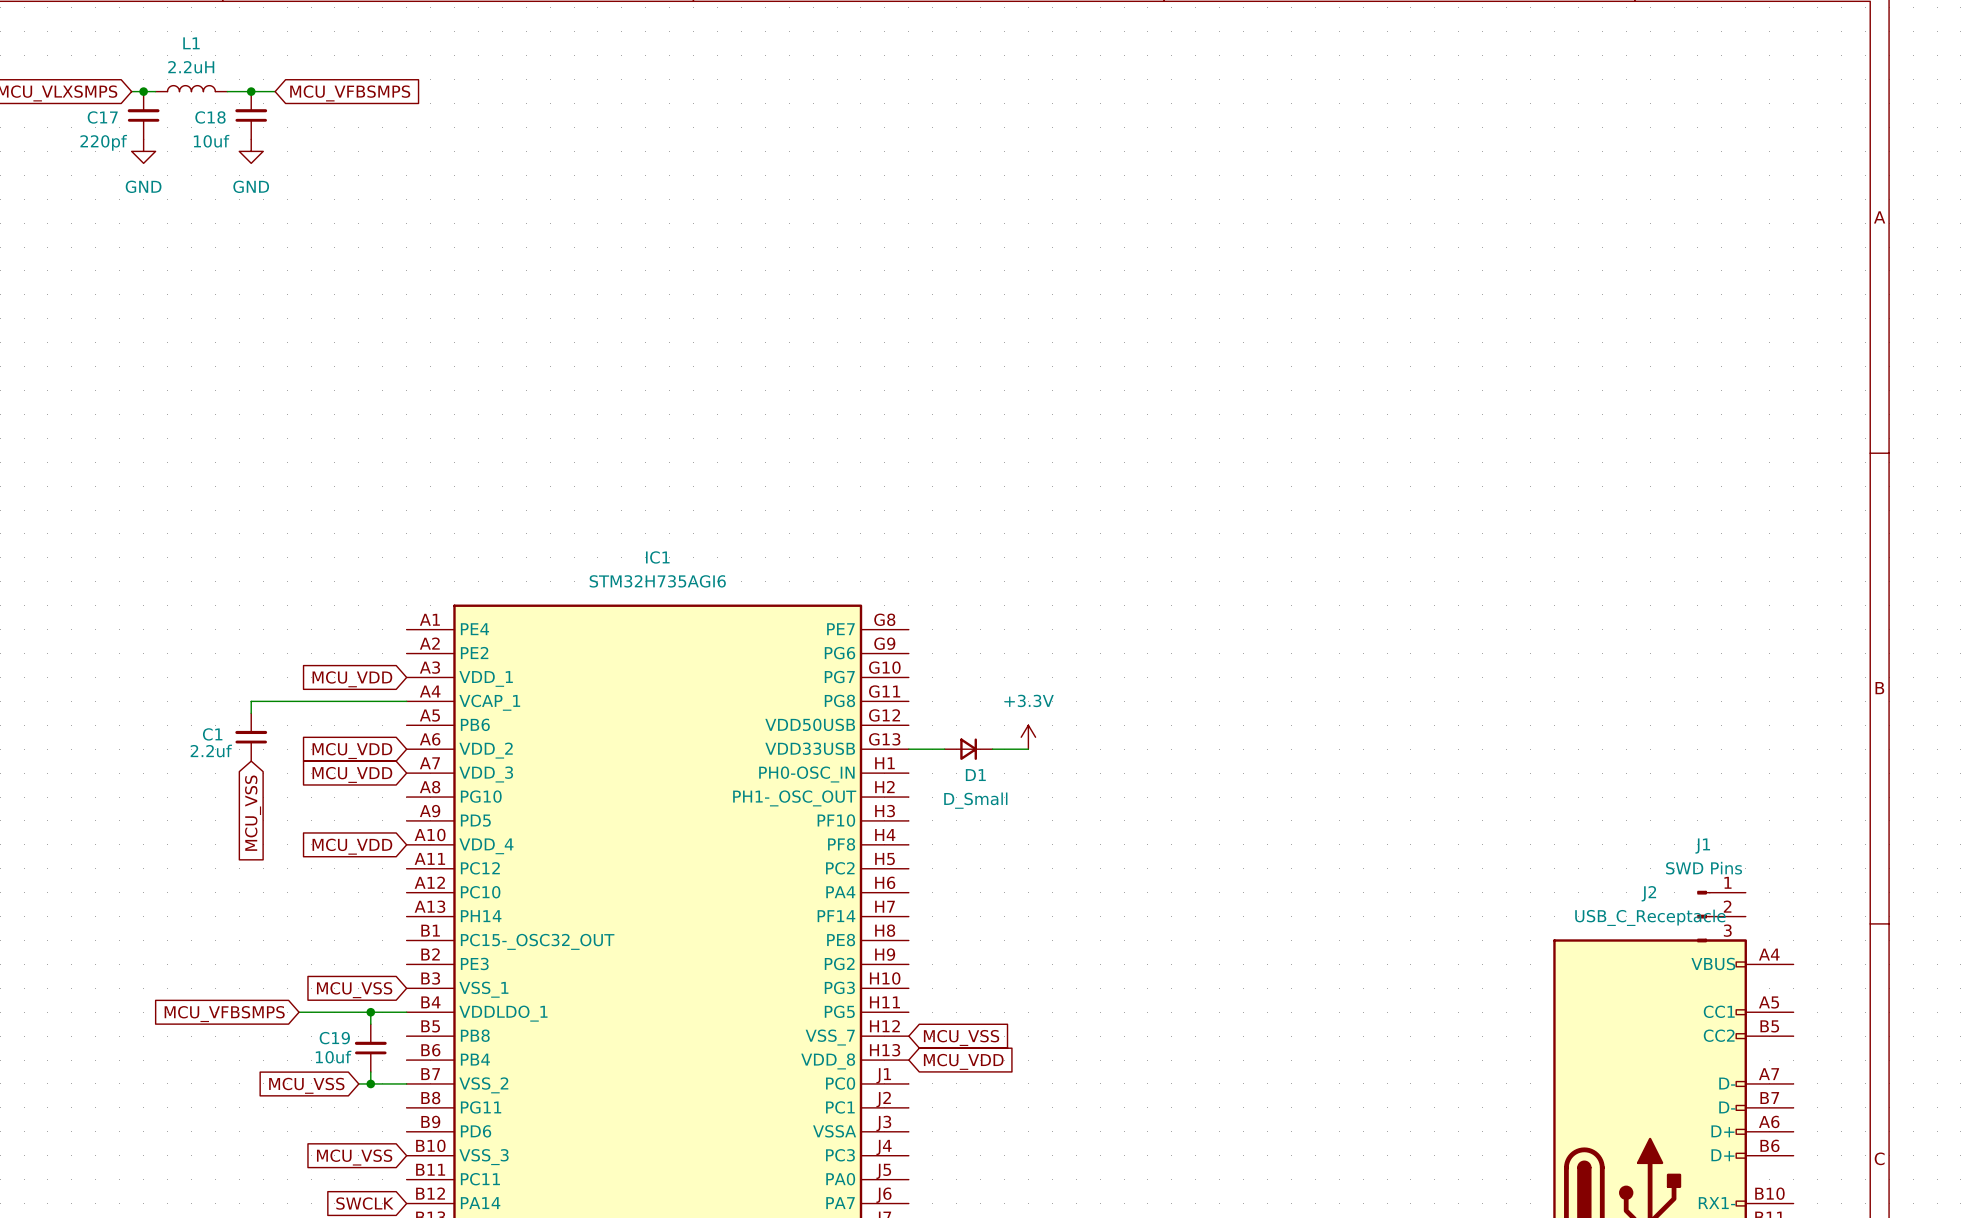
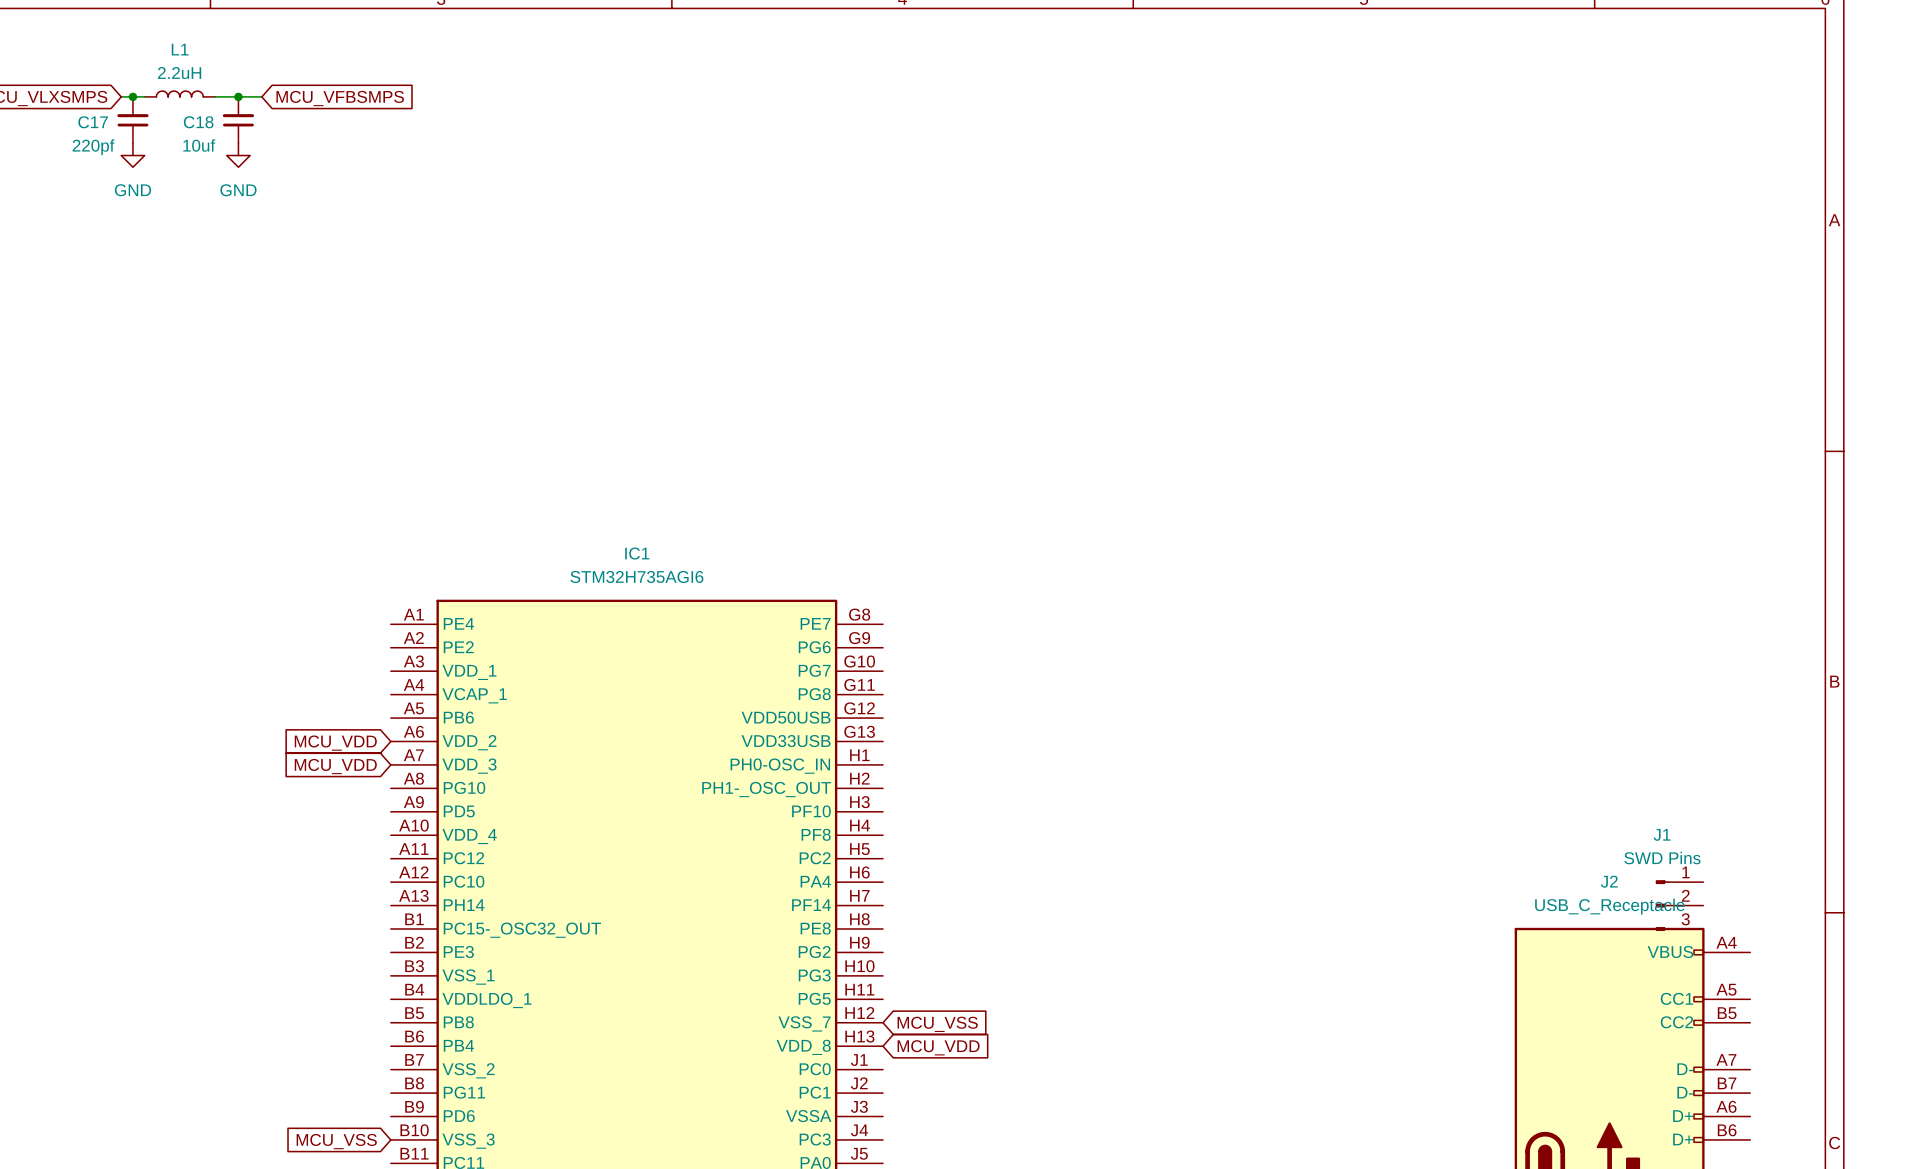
global label: MCU_VDD (352, 679) -> none
wire: (406, 701) (251, 701) (251, 713) -> none
C1: 2.2uf (251, 737) -> none
power symbol: +3.3V (1028, 737) -> none
wire: (908, 749) (944, 749) -> none
D1: D_Small (968, 749) -> none
wire: (992, 749) (1028, 749) -> none
global label: MCU_VSS (253, 813) -> none
global label: MCU_VDD (352, 846) -> none
global label: MCU_VSS (354, 990) -> none
wire: (299, 1012) (406, 1012) -> none
wire: (370, 1012) (370, 1024) -> none
junction: (370, 1012) -> none
global label: MCU_VFBSMPS (224, 1014) -> none
C19: 10uf (370, 1048) -> none
wire: (370, 1072) (370, 1083) -> none
wire: (358, 1083) (406, 1083) -> none
junction: (370, 1083) -> none
global label: MCU_VSS (306, 1085) -> none

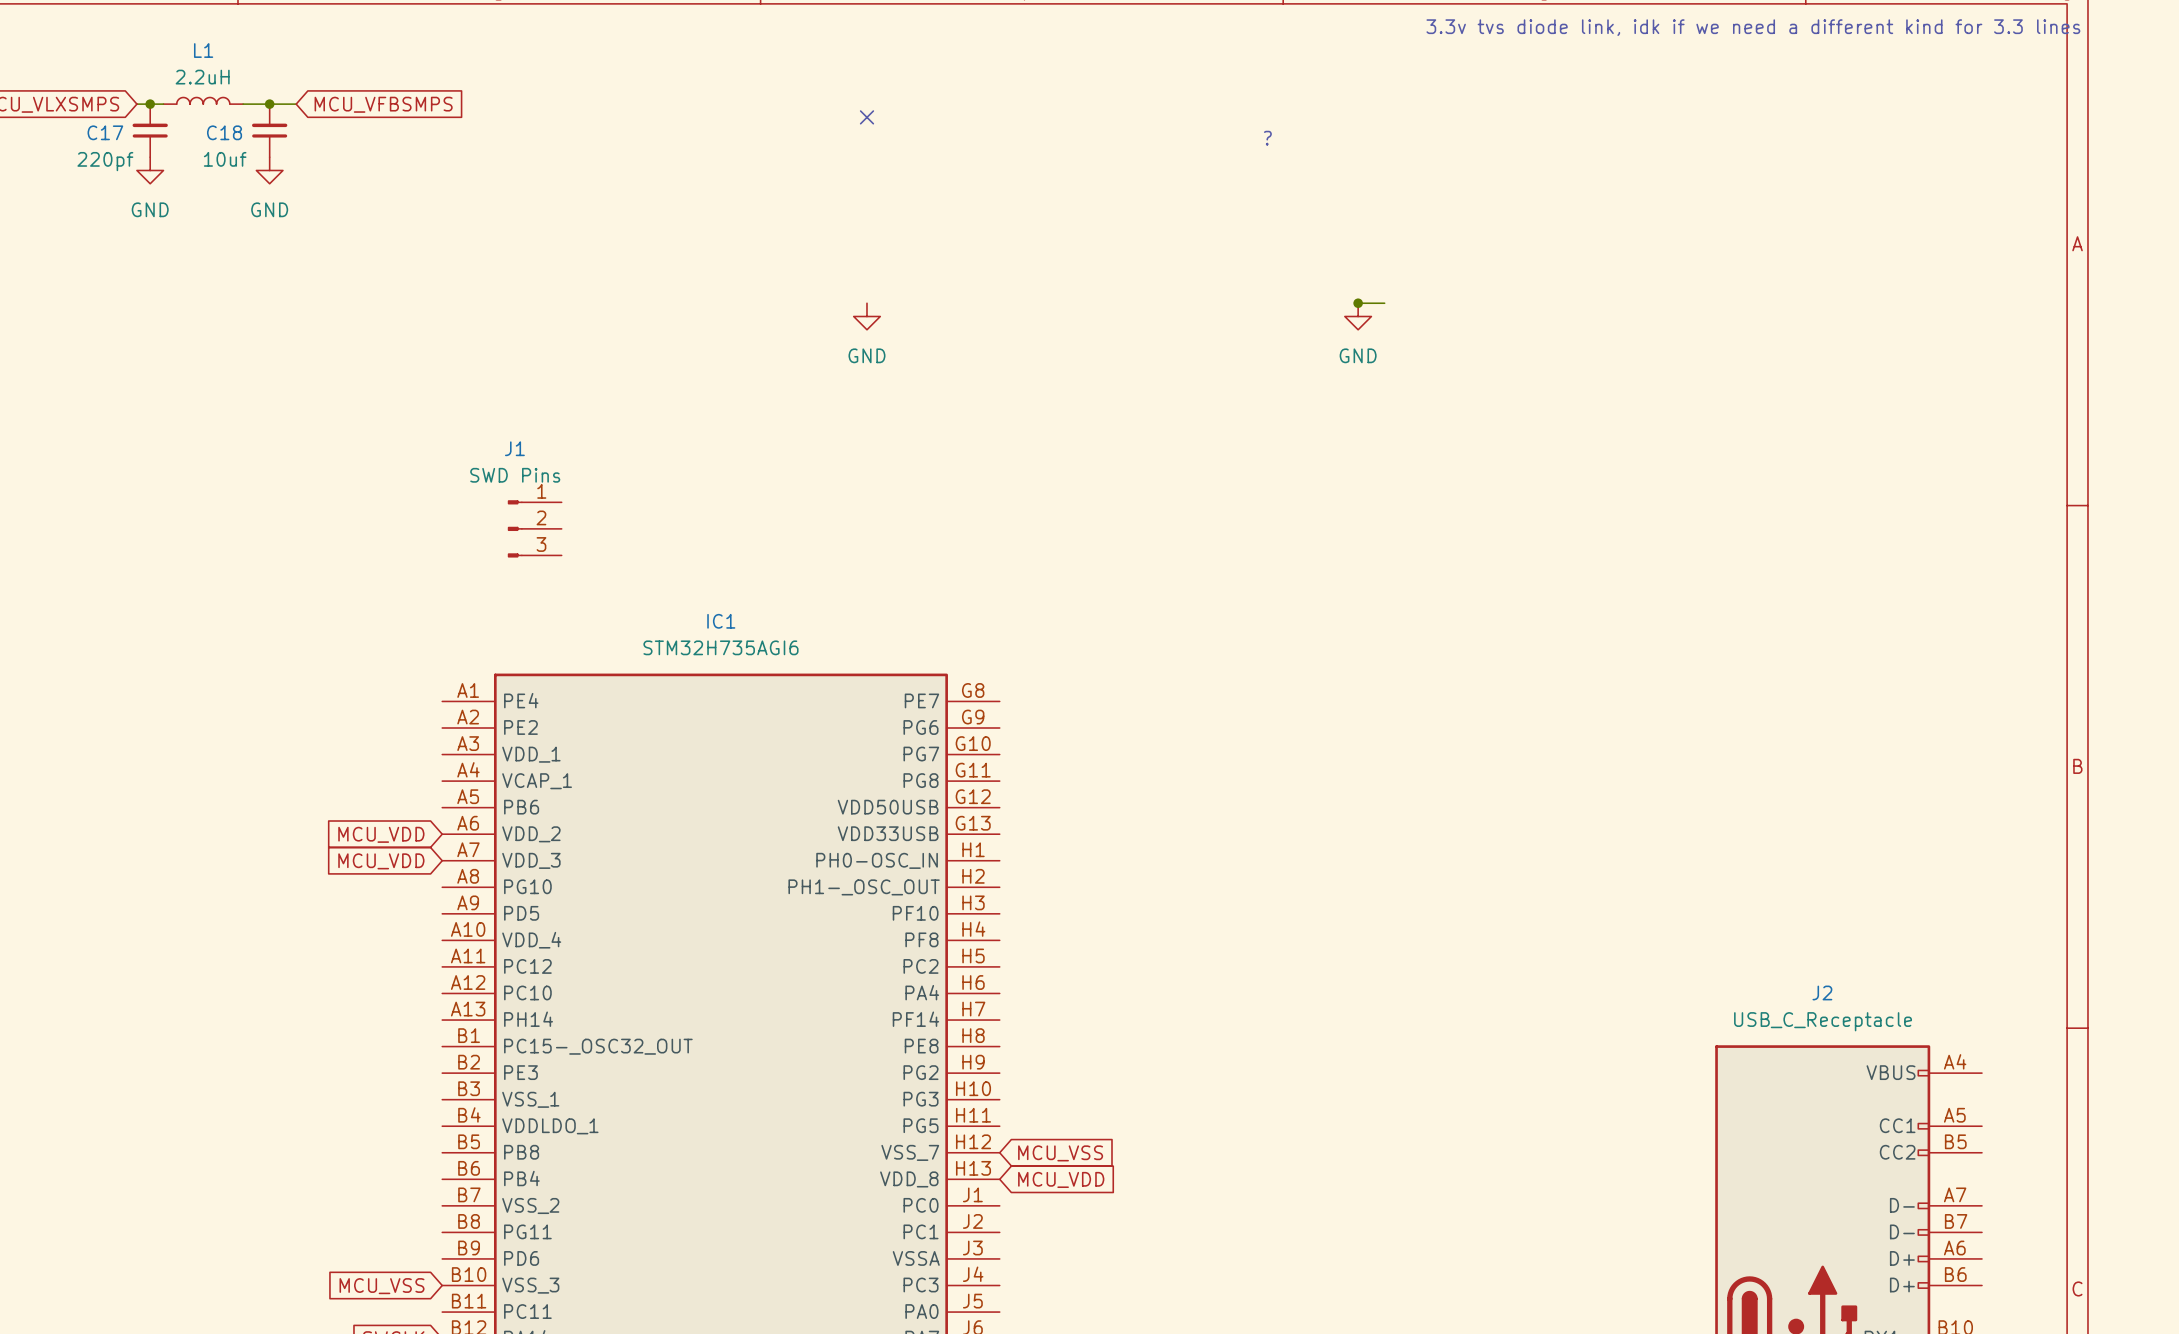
text: none -> 3.3v tvs diode link, idk if we need a different kind for 3.3 lines (1753, 27)
no-connect mark: none -> (866, 117)
text: none -> ? (1267, 138)
wire: none -> (1358, 303) (1384, 303)
junction: none -> (1358, 303)
power symbol: none -> GND (866, 316)
power symbol: none -> GND (1358, 316)
J1 position: (1679, 905) -> (534, 528)

